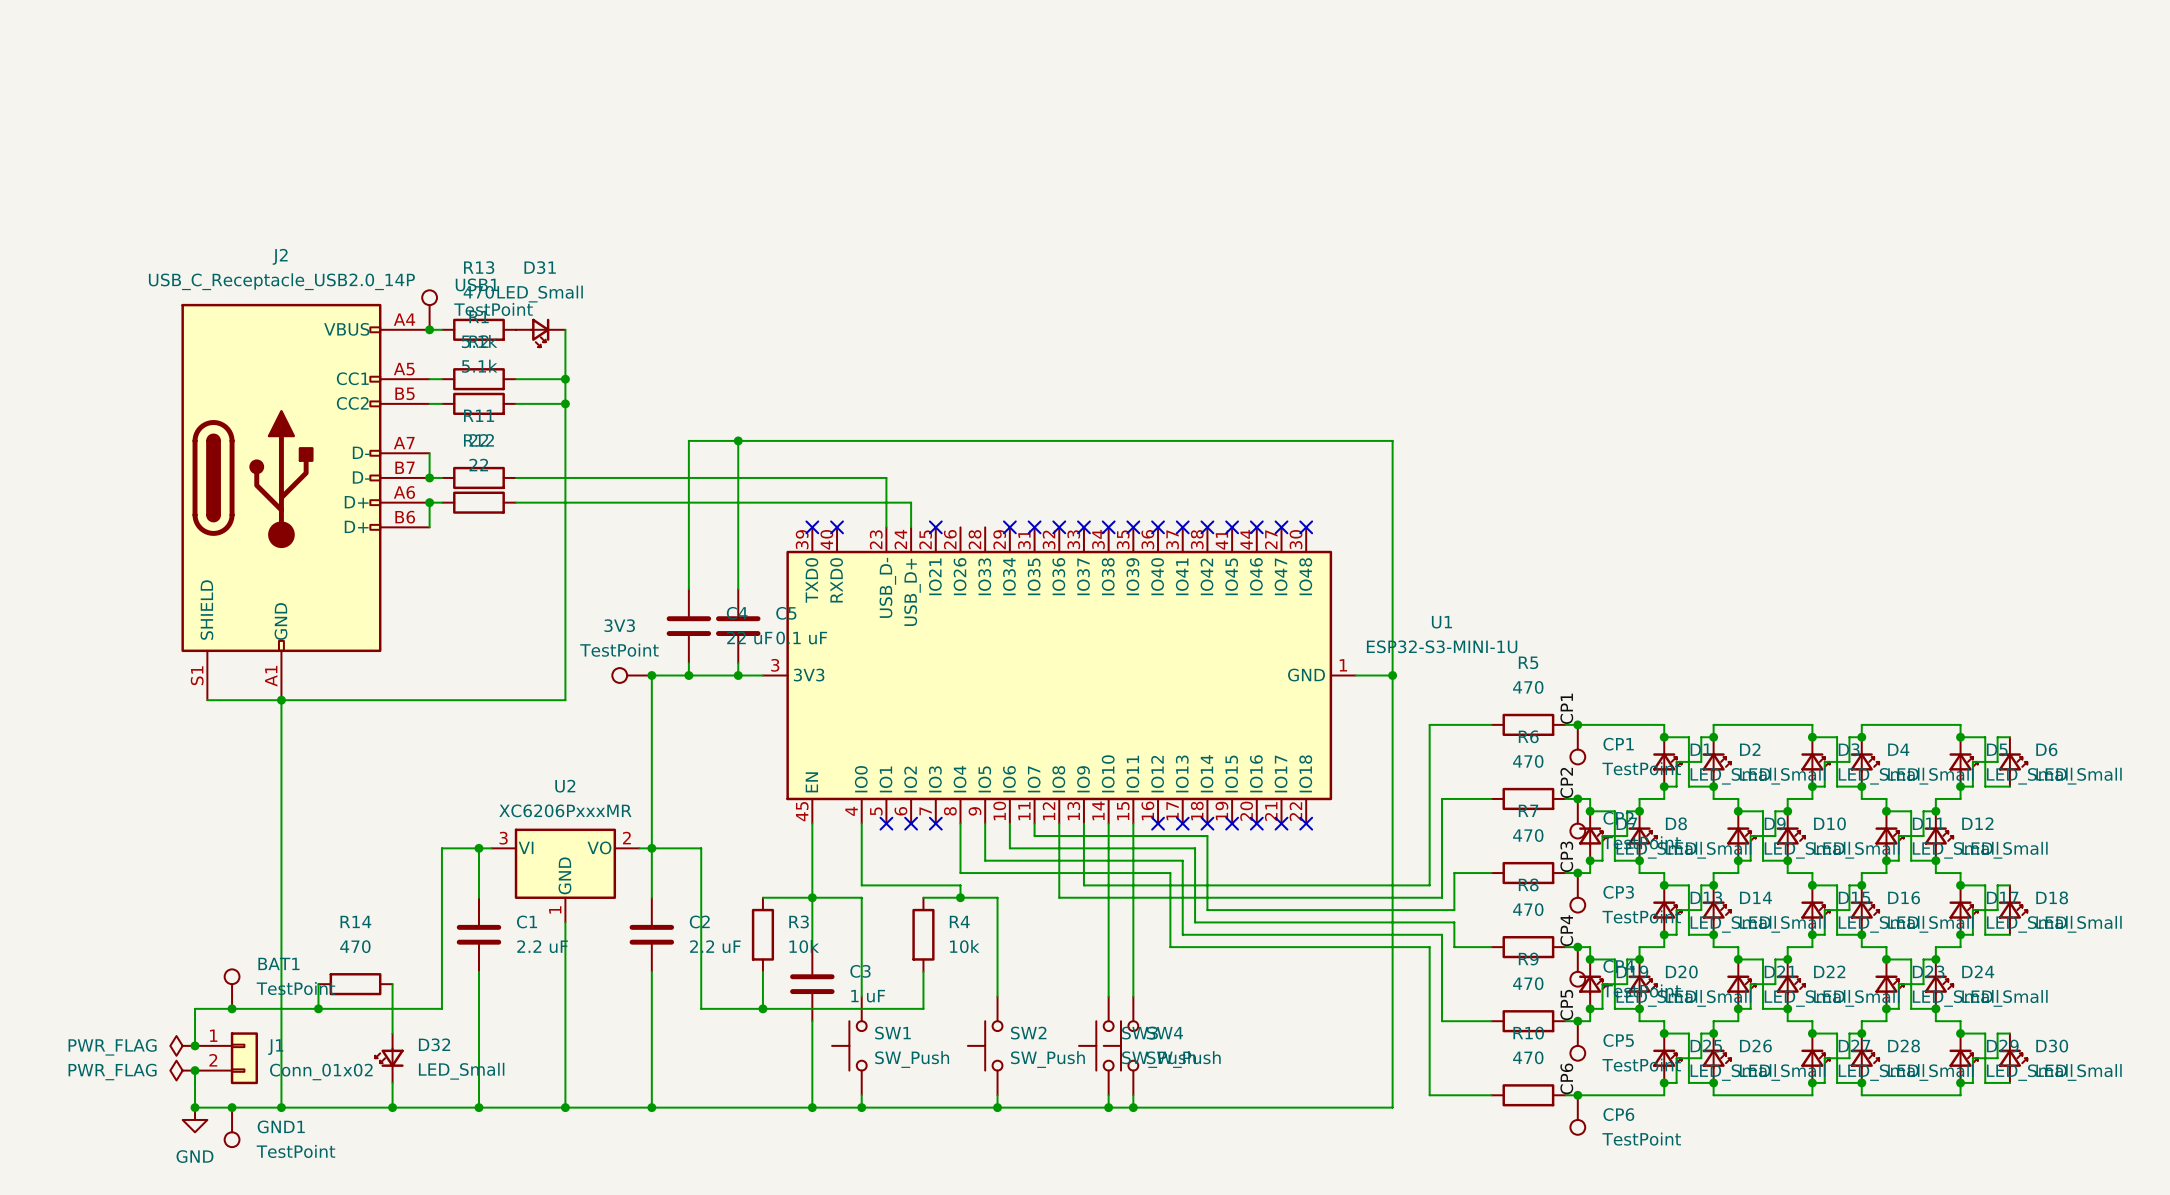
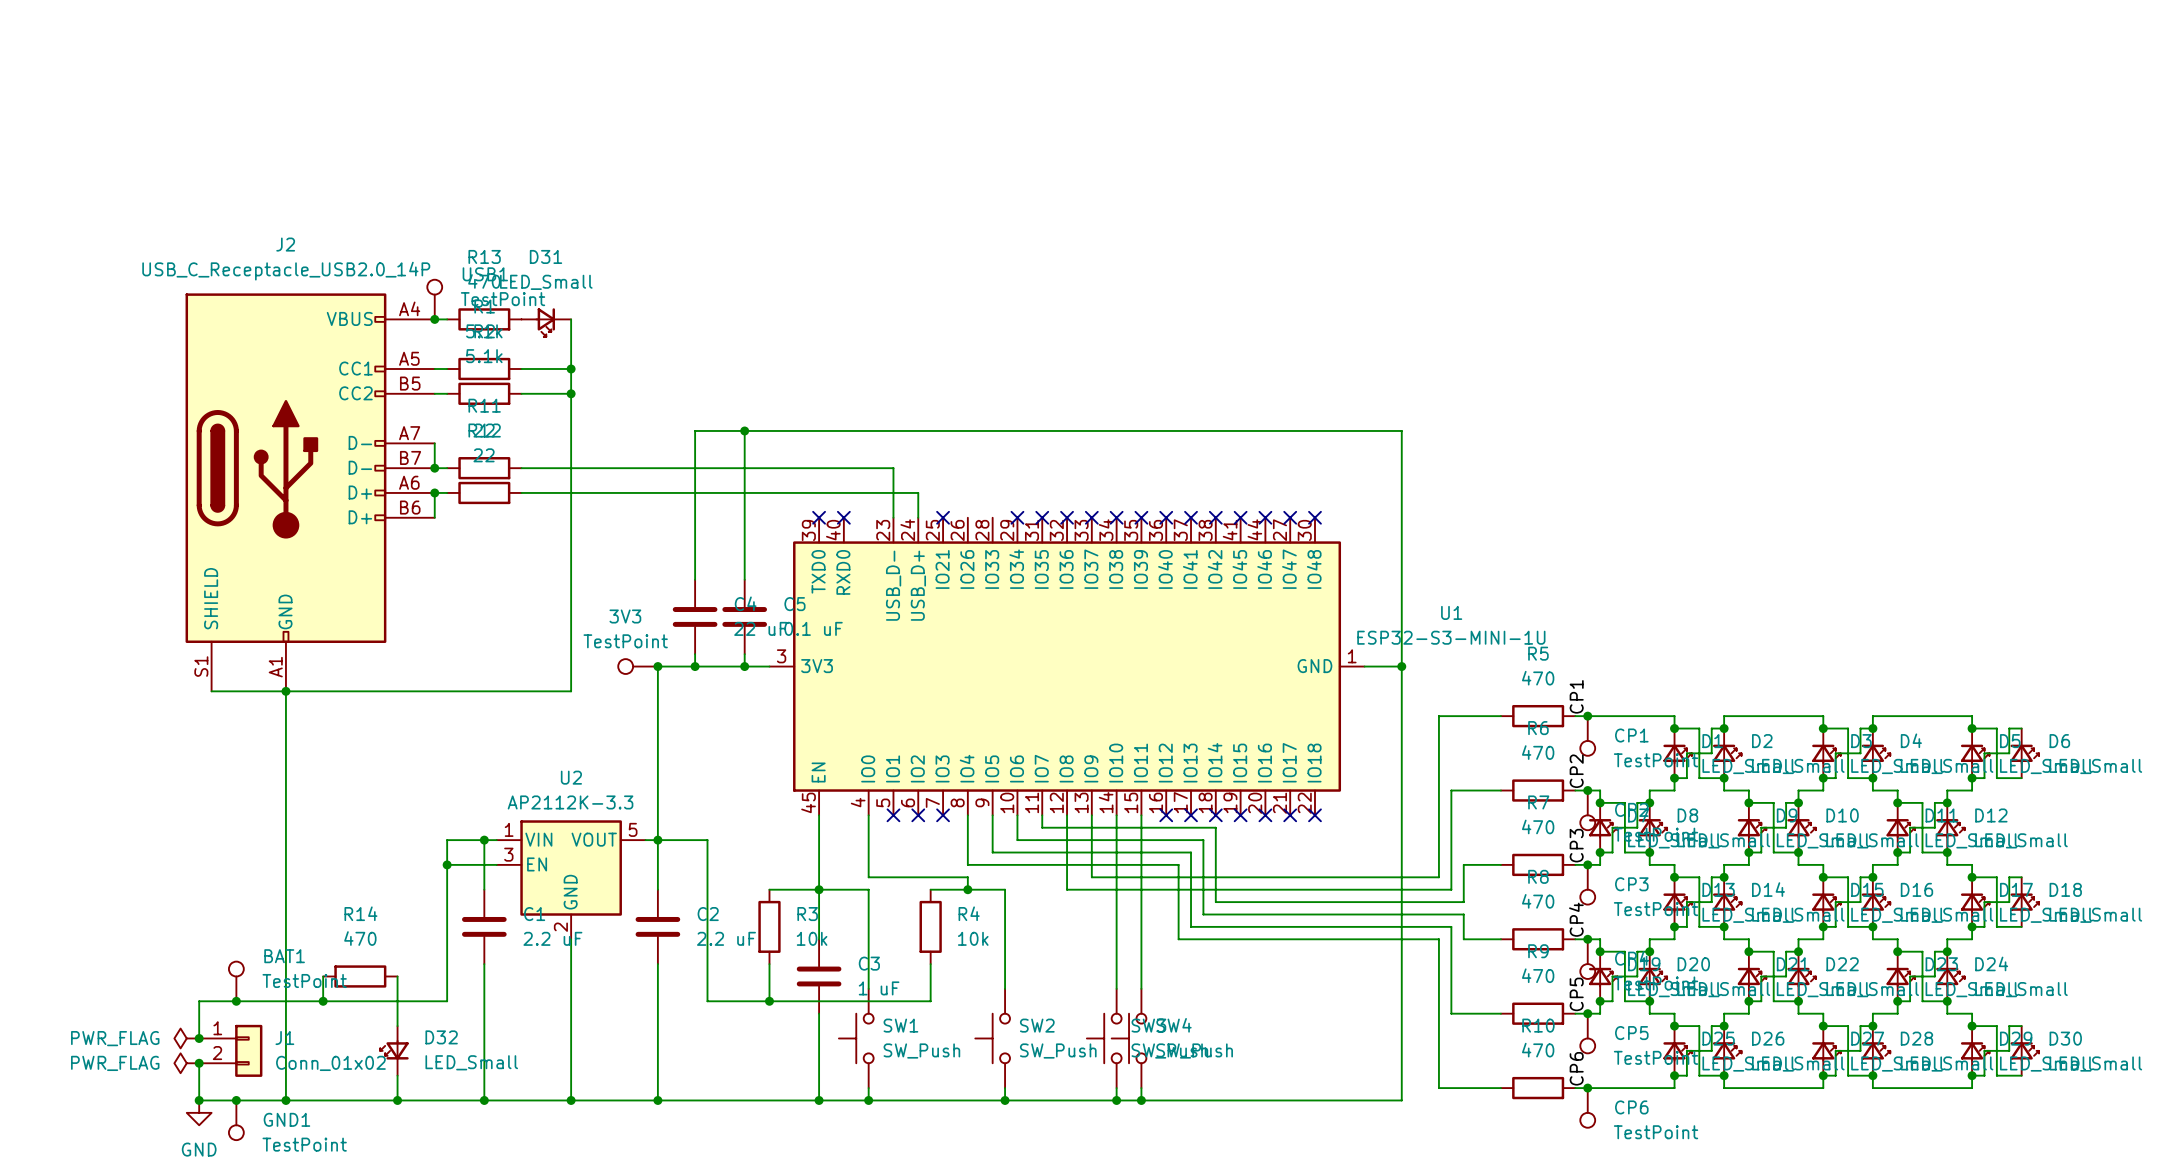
U2 value: XC6206PxxxMR (565, 810) -> AP2112K-3.3 (570, 802)
U2 symbol: [491, 828, 640, 923] -> [496, 820, 646, 940]
wire: none -> (447, 864) (496, 864)
junction: none -> (447, 864)

